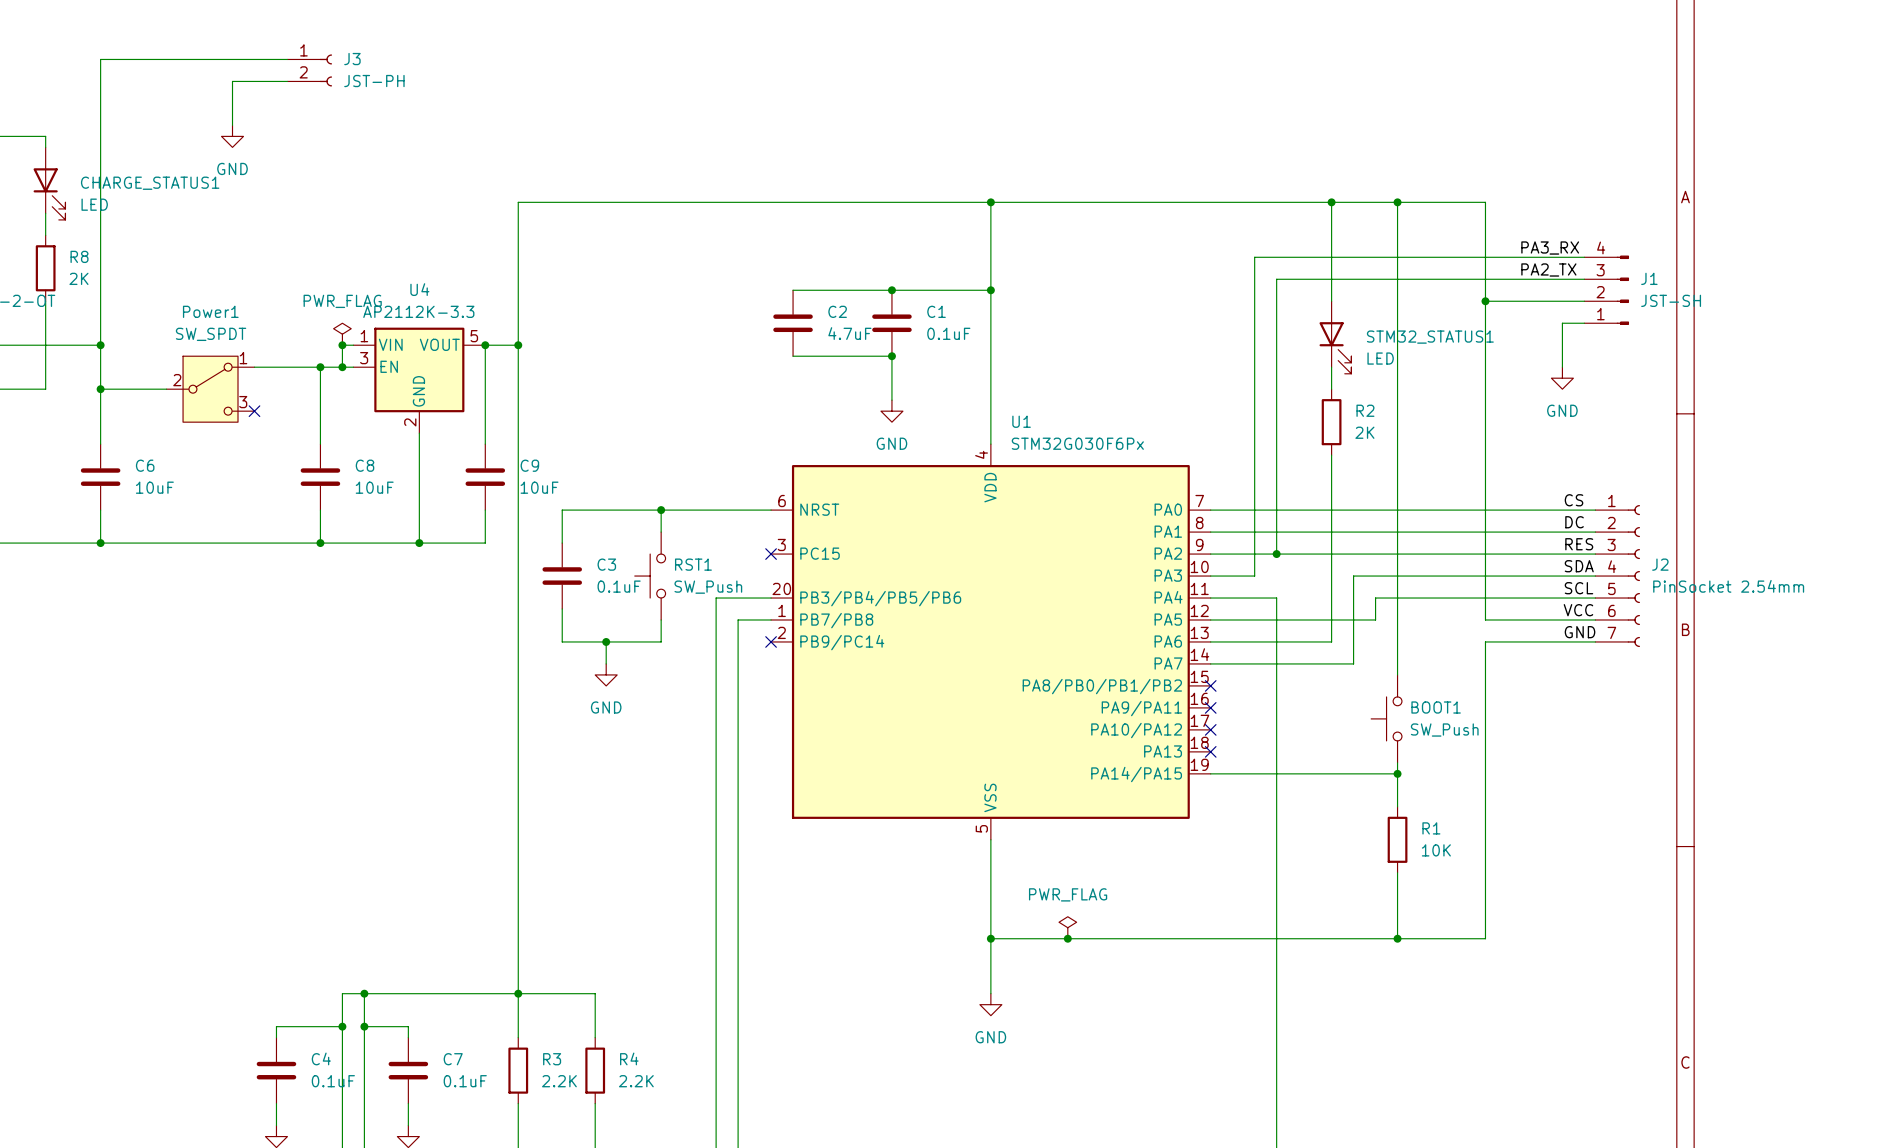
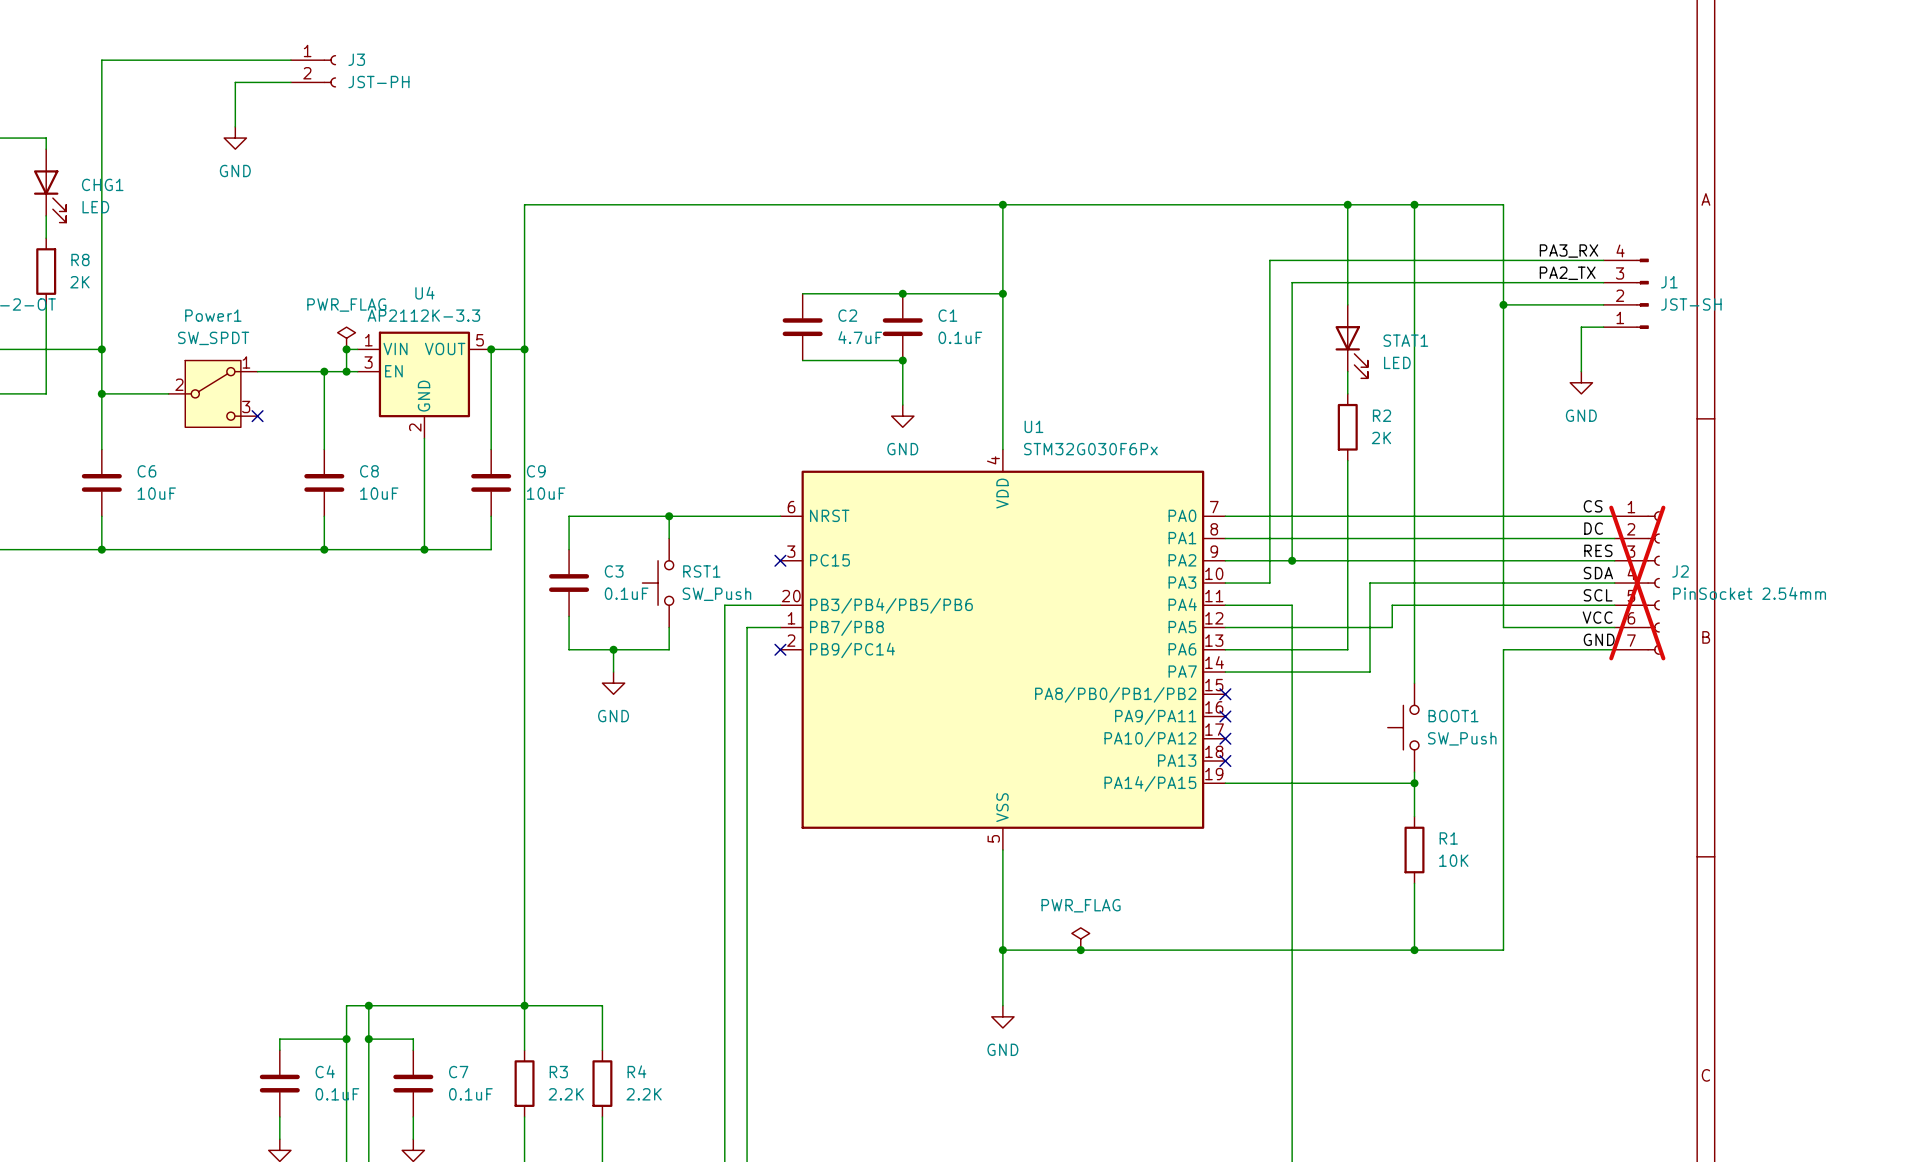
CHARGE_STATUS1 name: CHARGE_STATUS1 (150, 183) -> CHG1 (102, 184)
STM32_STATUS1 name: STM32_STATUS1 (1430, 337) -> STAT1 (1405, 340)
J2 do-not-place cross: none -> (1637, 583)

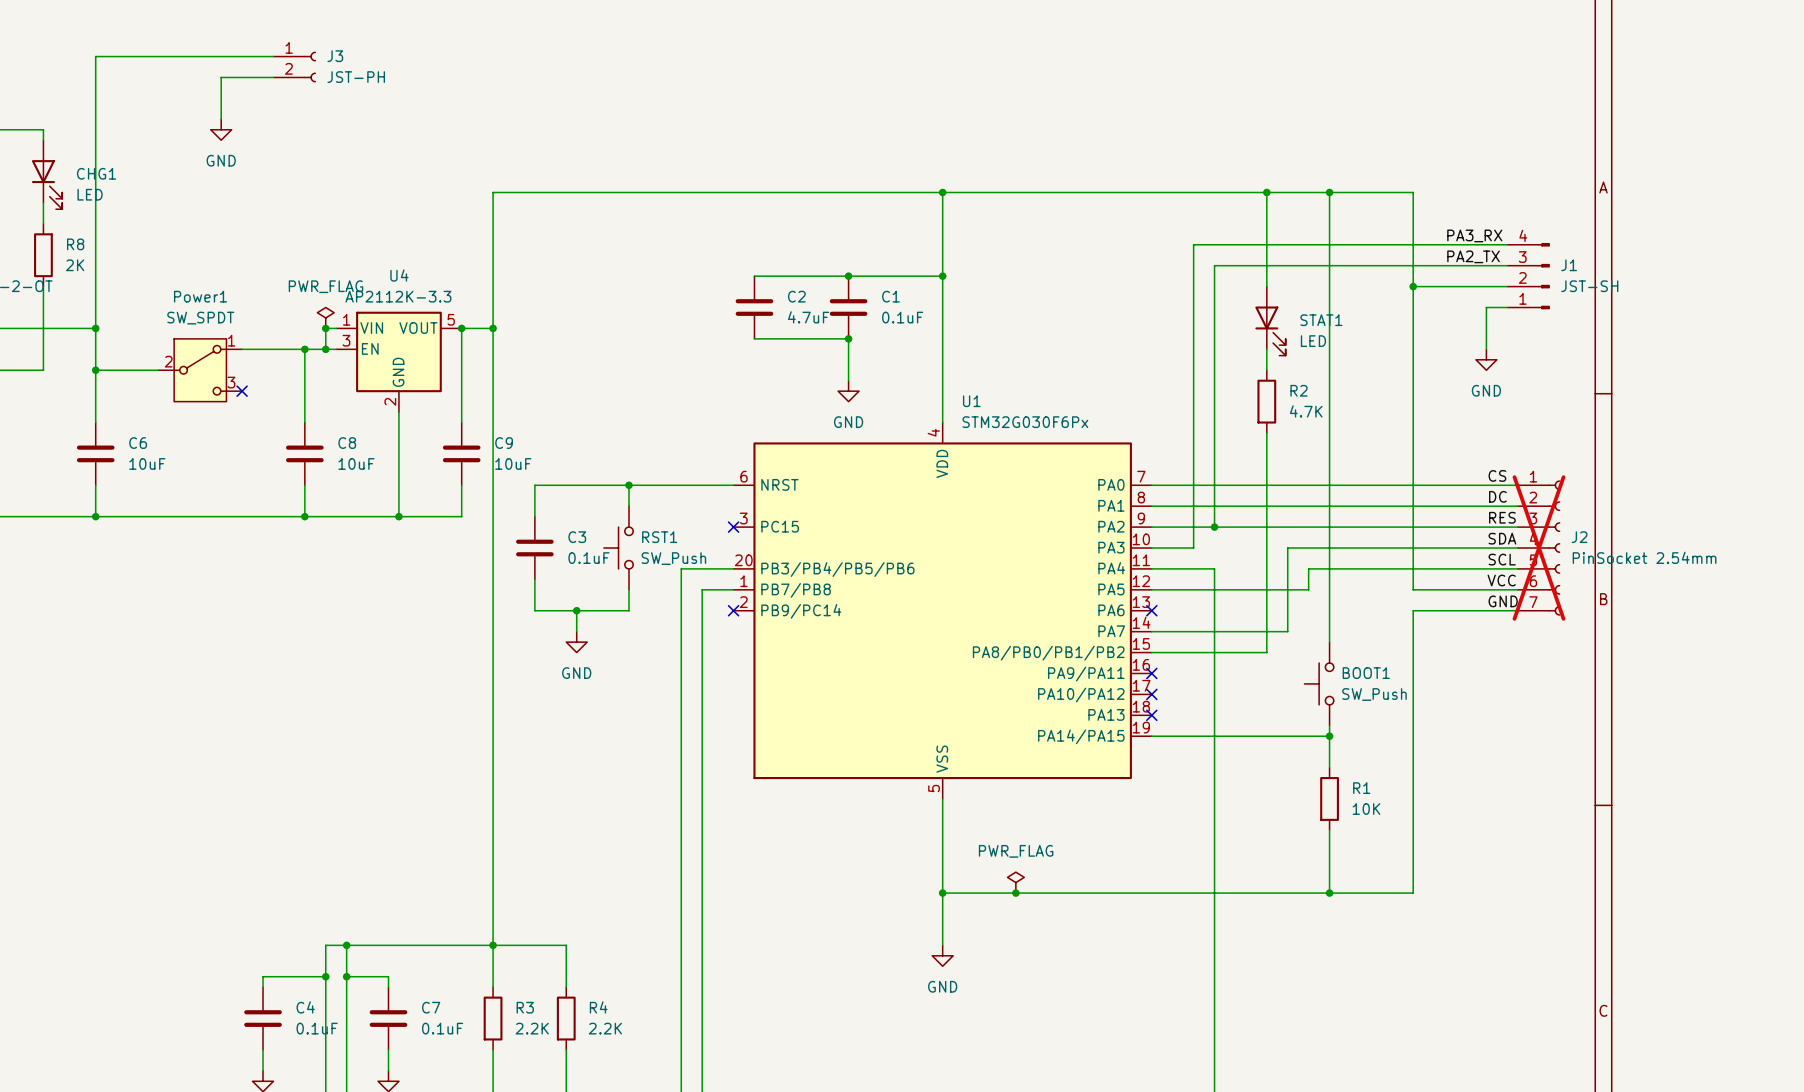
R2 value: 2K (1381, 437) -> 4.7K (1306, 411)
wire: (1225, 649) (1347, 649) -> (1151, 652) (1266, 652) (1266, 610)
no-connect mark position: (1225, 694) -> (1151, 610)

